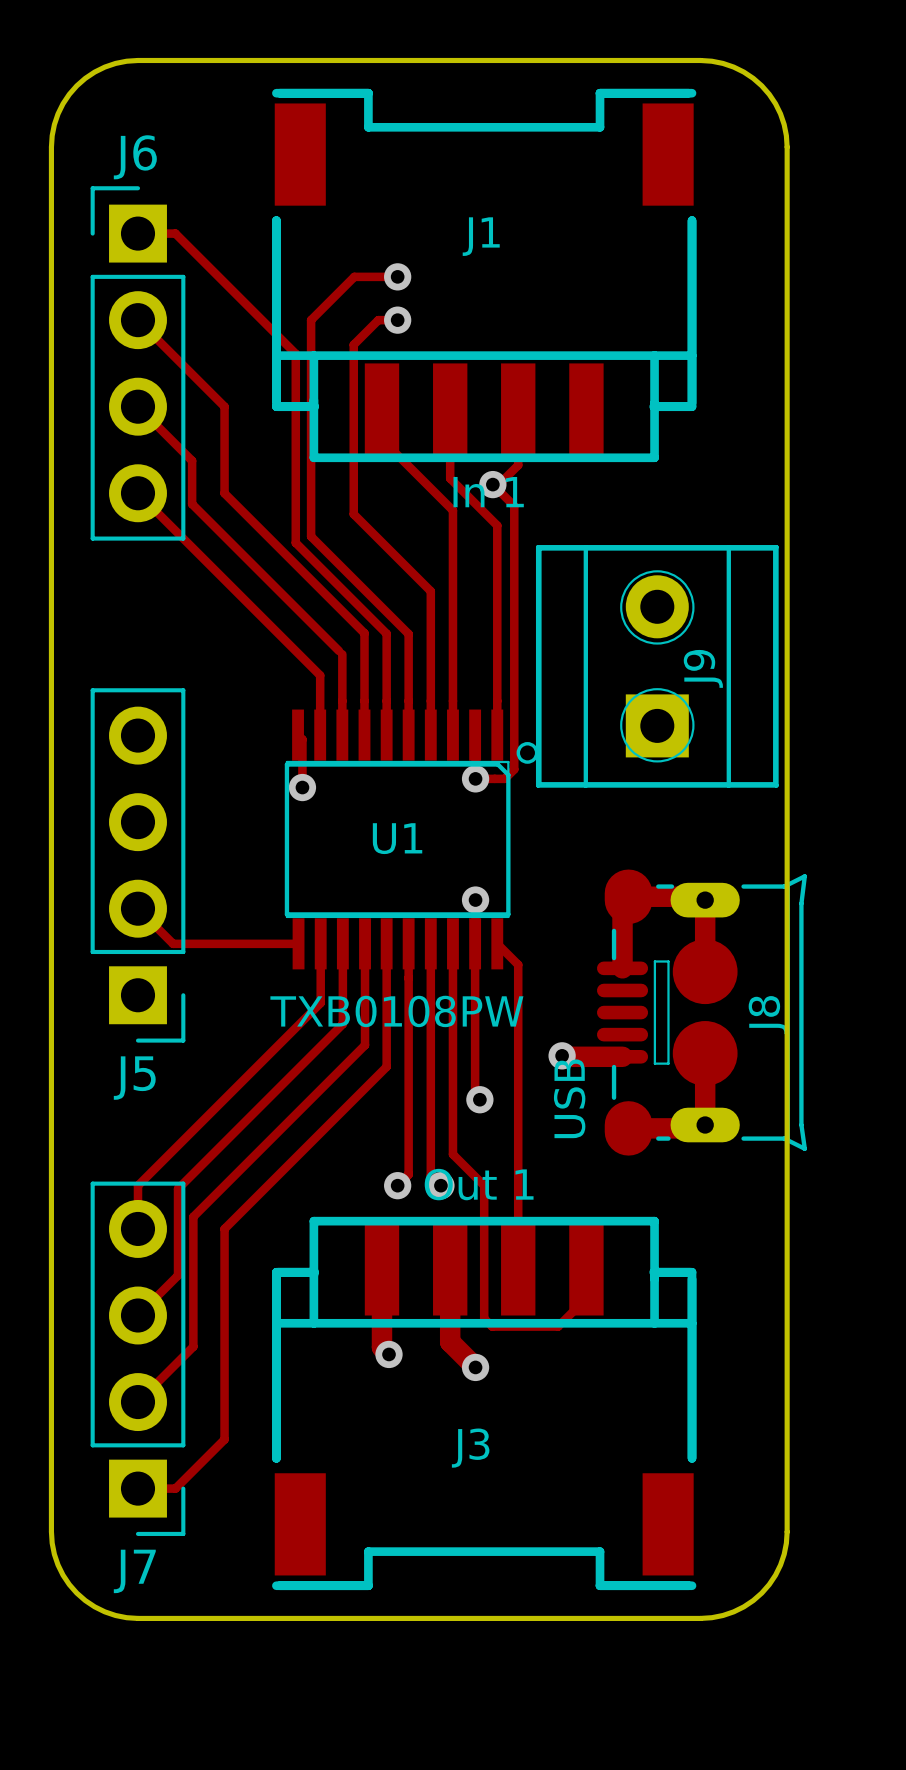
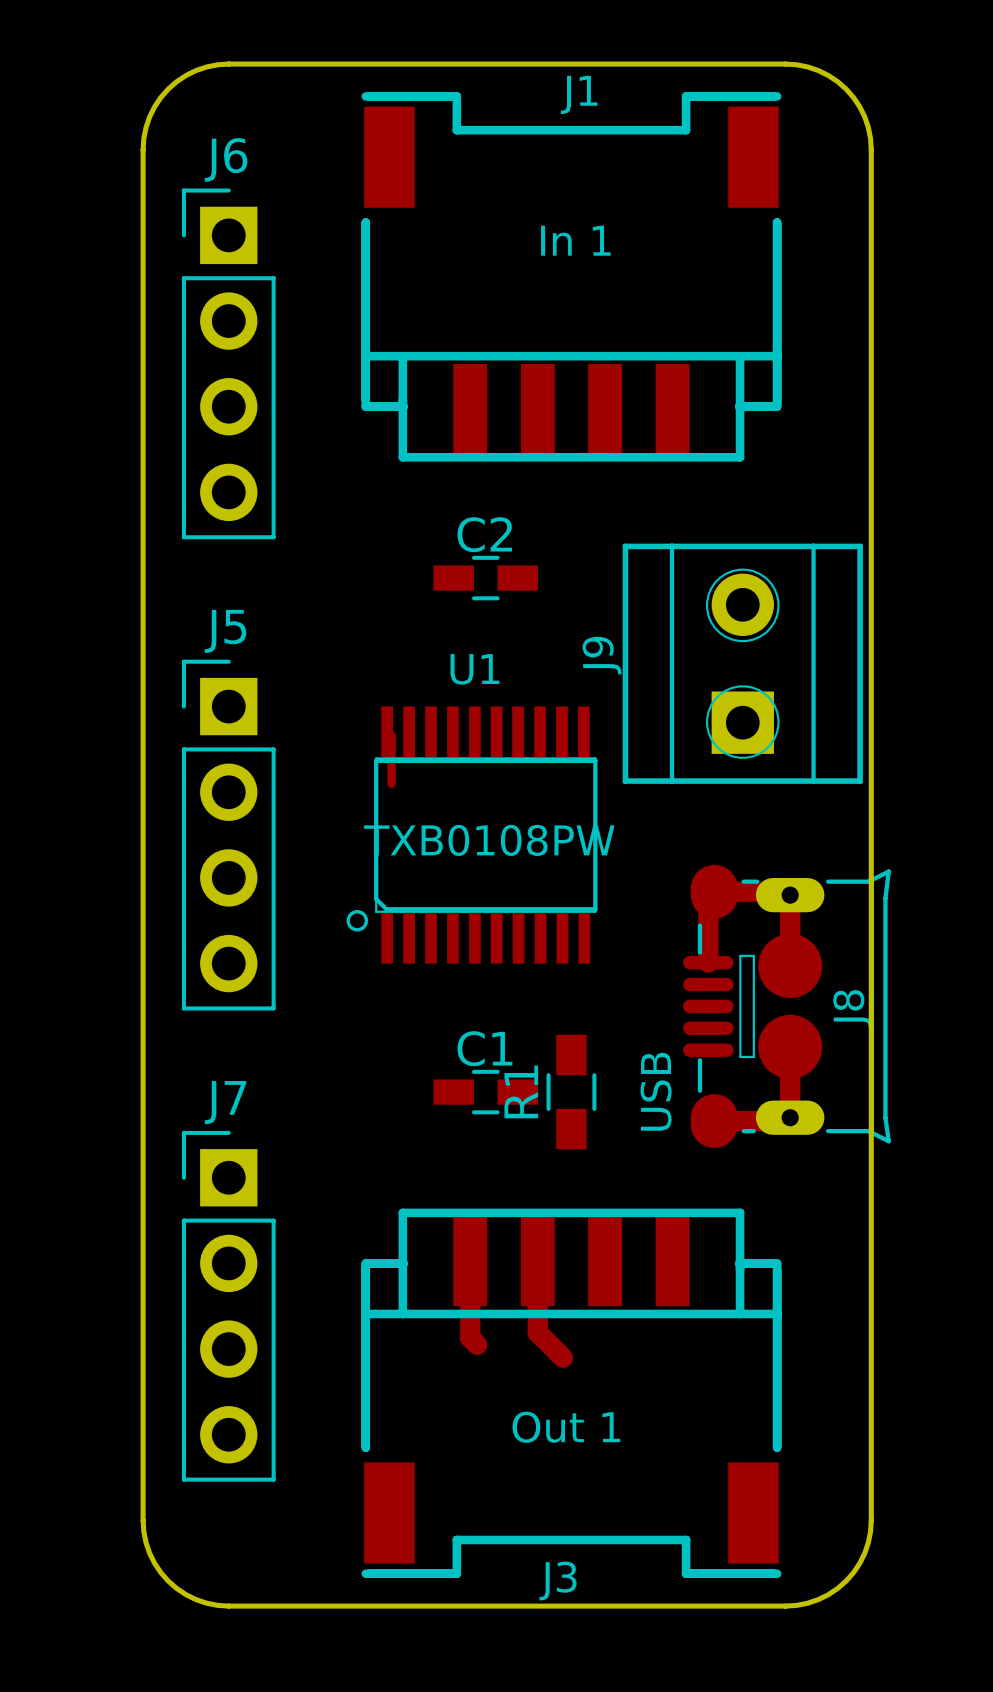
track: (137, 233) (175, 233) (295, 353) (295, 542) (386, 633) (386, 735) -> none
J1 name position: J1 (481, 236) -> J1 (579, 94)
track: (397, 276) (354, 276) (311, 320) (311, 536) (408, 634) (408, 735) -> none
via: (397, 276) -> none
track: (137, 320) (224, 406) (224, 493) (364, 633) (364, 735) -> none
track: (397, 320) (378, 320) (353, 344) (353, 514) (430, 591) (430, 735) -> none
via: (397, 320) -> none
track: (137, 406) (192, 460) (192, 504) (339, 651) -> none
track: (381, 410) (381, 439) (452, 510) (452, 735) -> none
track: (450, 410) (450, 478) (497, 525) (497, 735) -> none
track: (518, 410) (518, 465) (498, 484) (492, 484) (514, 506) (514, 769) (504, 778) (475, 778) (475, 735) -> none
via: (492, 484) -> none
J1 value position: In 1 (488, 492) -> In 1 (575, 240)
track: (137, 493) (320, 675) (320, 735) -> none
C2: none -> (485, 578)
track: (342, 654) (342, 735) -> none
J9 name position: J9 (703, 668) -> J9 (602, 655)
via: (475, 778) -> none
via: (302, 787) -> none
U1 name position: U1 (397, 838) -> U1 (474, 669)
U1 rotation: 0° (411, 839) -> 180° (472, 835)
J5 rotation: 0° (137, 865) -> 180° (228, 835)
via: (475, 900) -> none
track: (137, 908) (173, 943) (298, 943) -> none
track: (320, 943) (320, 1002) (137, 1185) (137, 1228) -> none
track: (342, 943) (342, 1024) (178, 1188) (178, 1275) (137, 1315) -> none
track: (365, 943) (365, 1045) (193, 1216) (193, 1346) (137, 1402) -> none
track: (386, 943) (386, 1066) (224, 1228) (224, 1439) (175, 1488) (137, 1488) -> none
track: (408, 943) (408, 1174) (397, 1185) -> none
track: (430, 943) (430, 1175) (440, 1185) -> none
track: (452, 943) (452, 1154) (484, 1185) (484, 1318) (492, 1326) (558, 1326) (586, 1298) (586, 1268) -> none
track: (475, 943) (475, 1094) (479, 1099) -> none
track: (497, 943) (518, 964) (518, 1268) -> none
U1 value position: TXB0108PW (396, 1011) -> TXB0108PW (489, 840)
track: (562, 1055) (622, 1056) -> none
via: (562, 1055) -> none
C1: none -> (485, 1092)
via: (479, 1099) -> none
R1: none -> (571, 1092)
J3 value position: Out 1 (479, 1184) -> Out 1 (566, 1427)
via: (397, 1185) -> none
via: (440, 1185) -> none
via: (389, 1354) -> none
J7 rotation: 0° (137, 1358) -> 180° (228, 1306)
via: (475, 1367) -> none
J3 name position: J3 (470, 1448) -> J3 (558, 1580)

